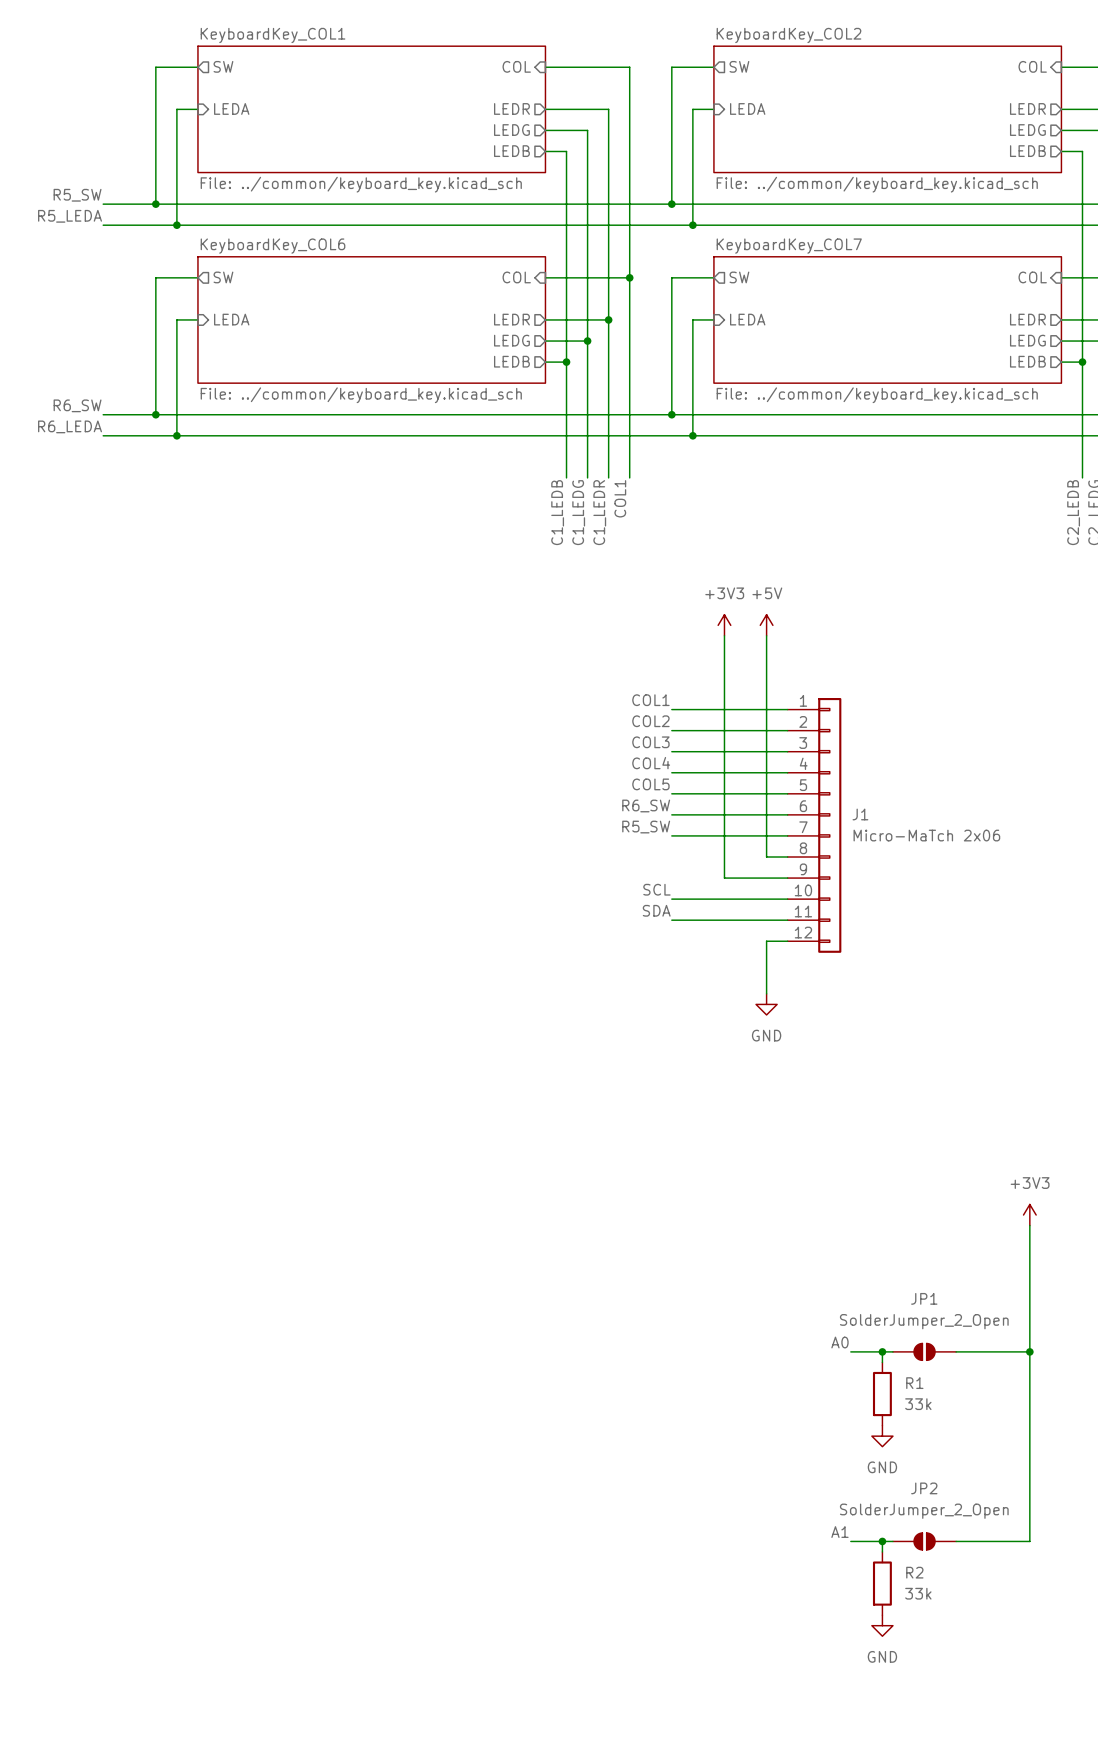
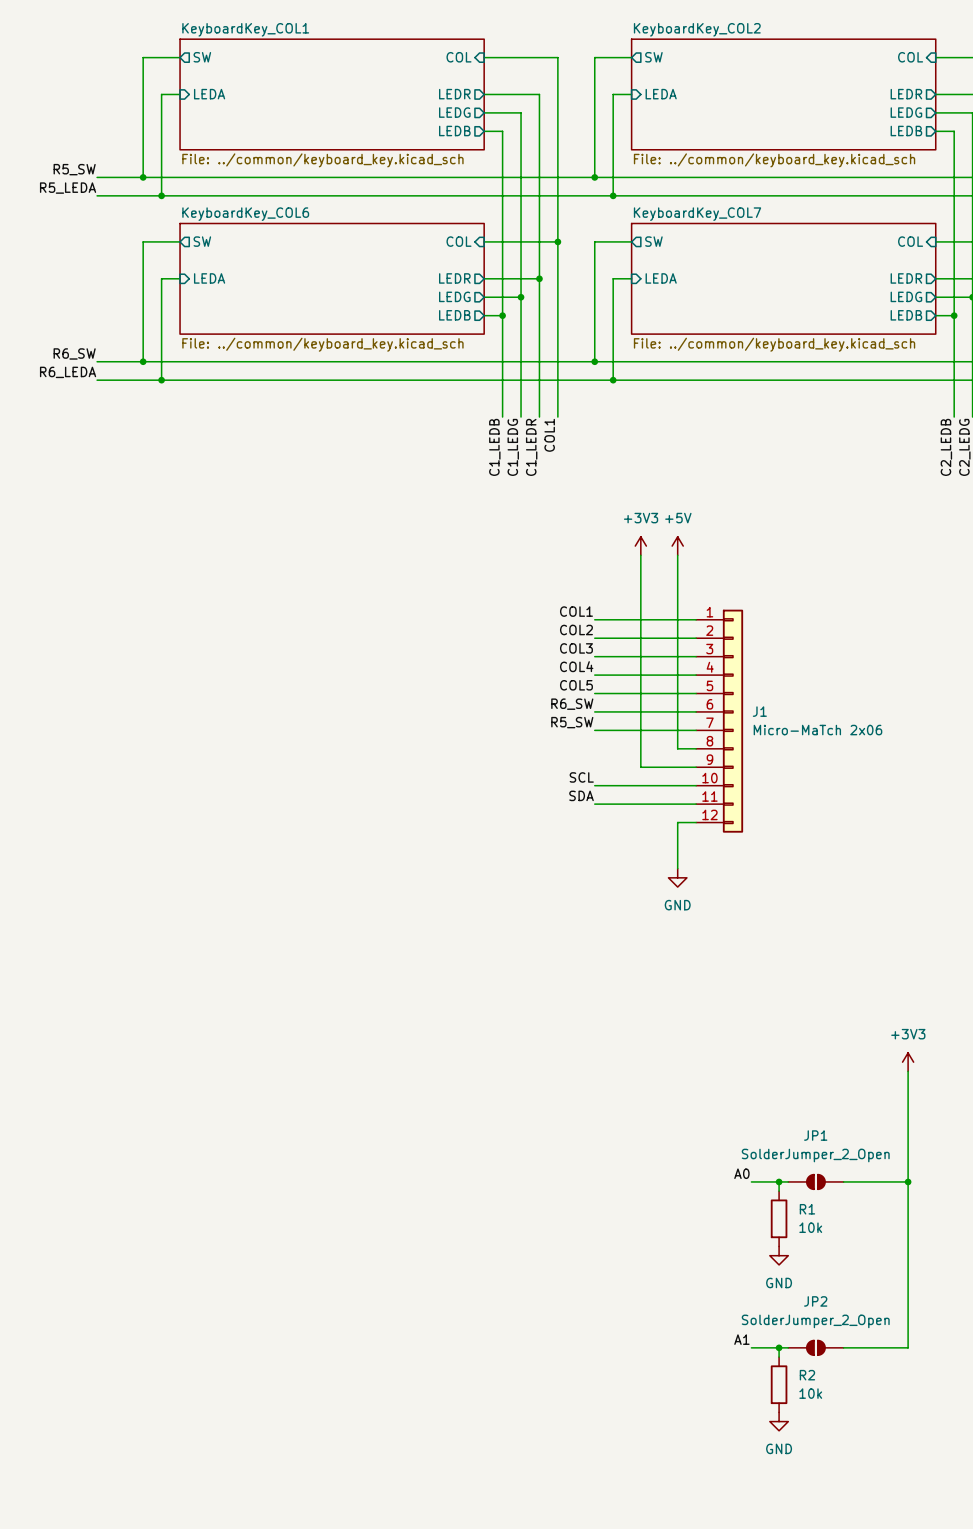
R1 value: 33k (918, 1404) -> 10k (810, 1227)
R2 value: 33k (918, 1593) -> 10k (810, 1393)

